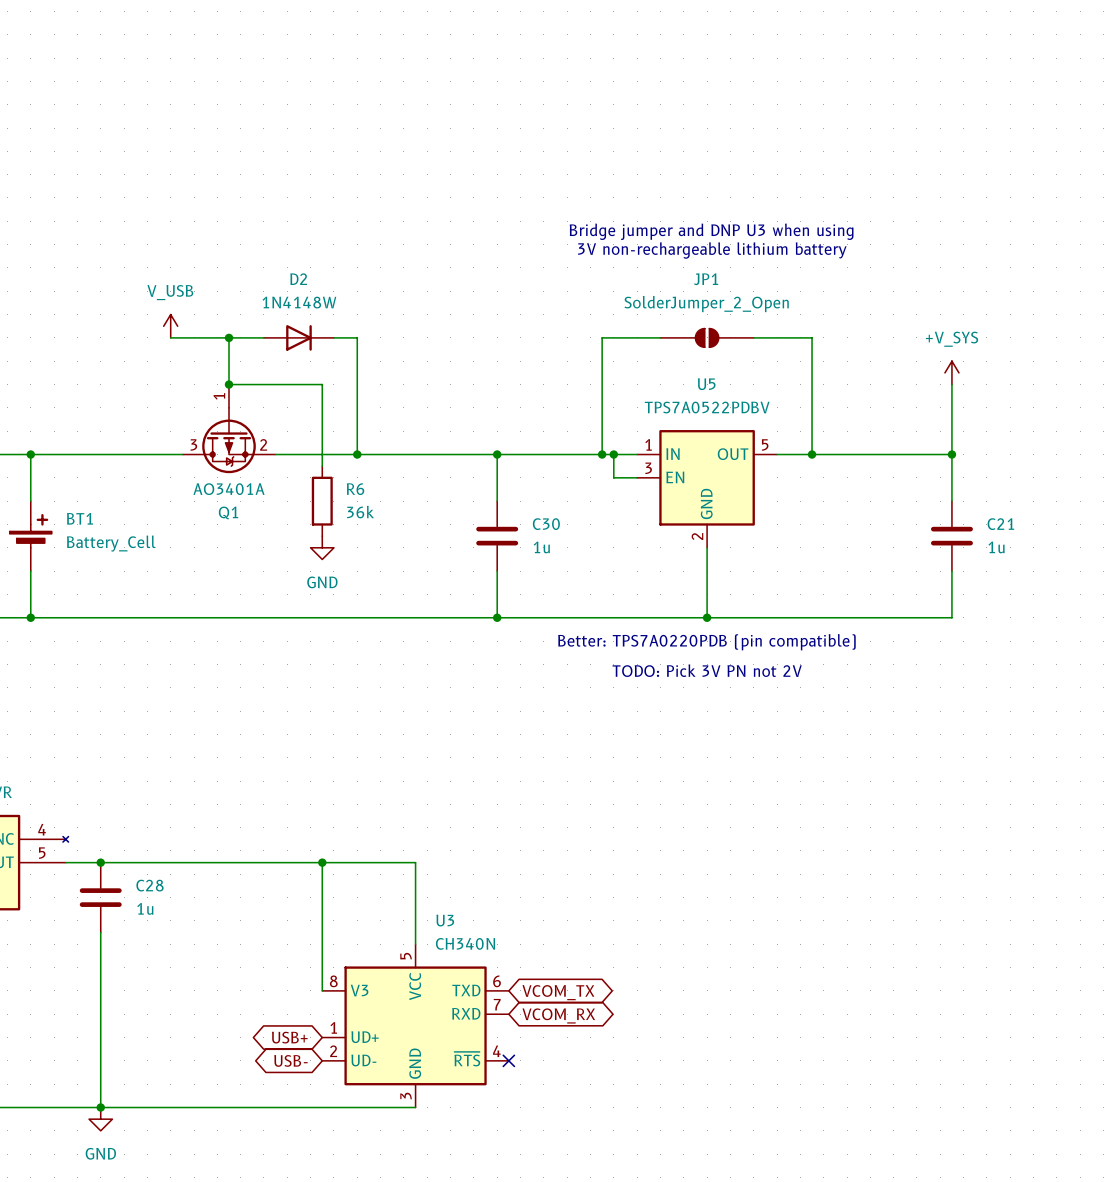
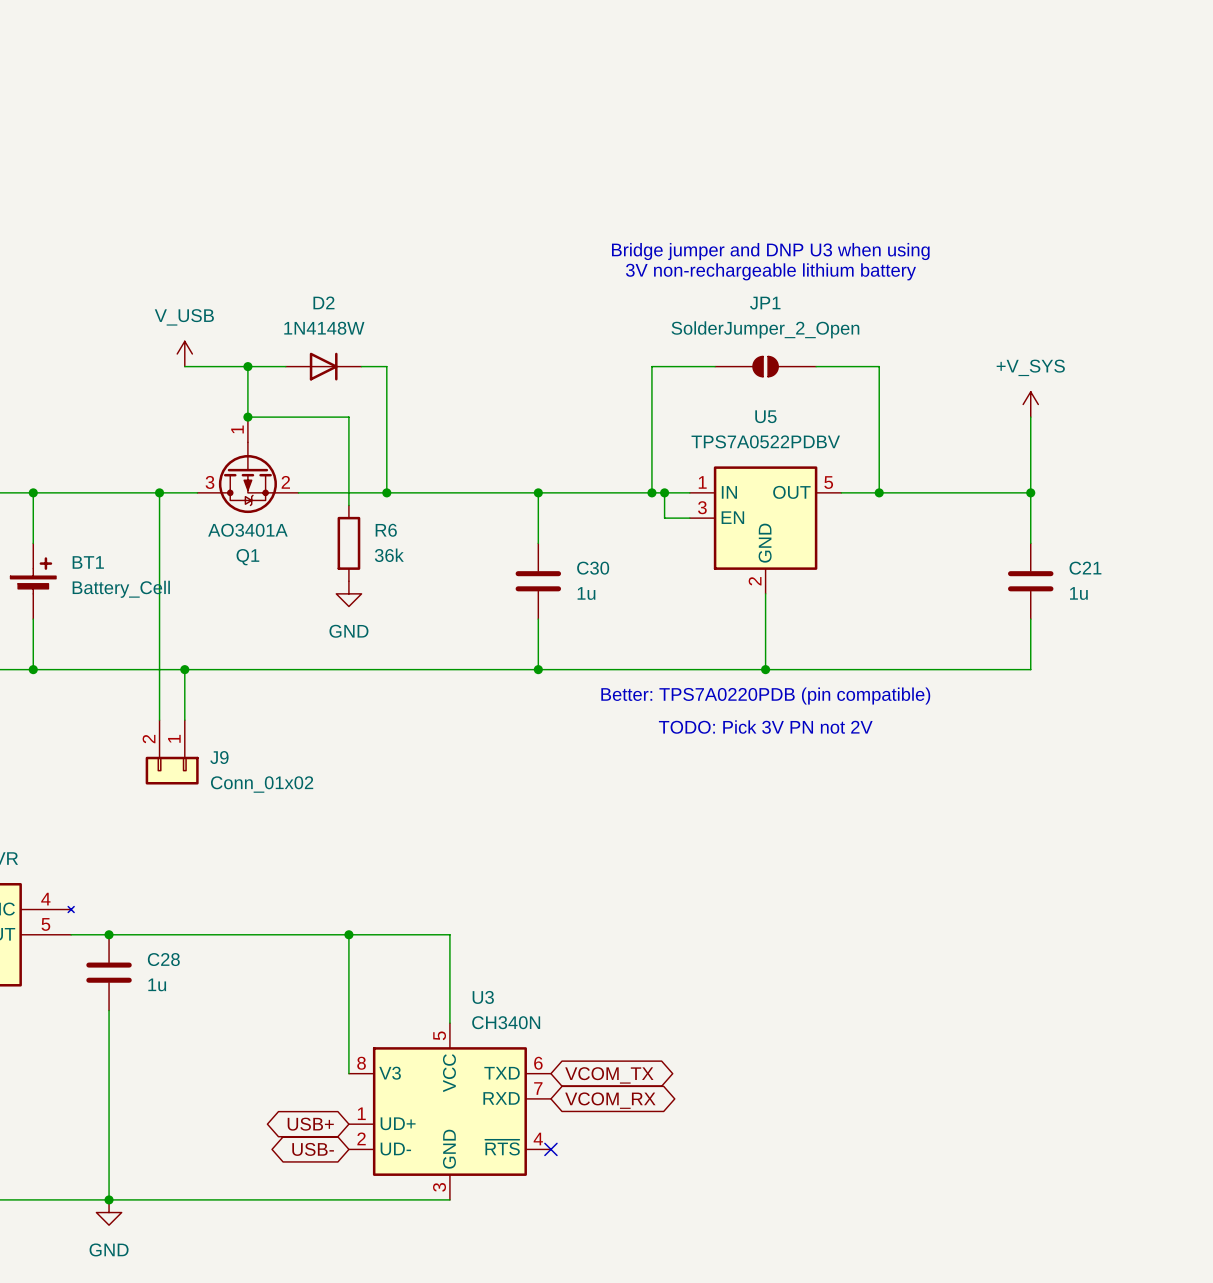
wire: none -> (159, 492) (159, 720)
junction: none -> (159, 492)
wire: none -> (184, 669) (184, 720)
junction: none -> (184, 669)
J9: none -> Conn_01x02 (172, 752)

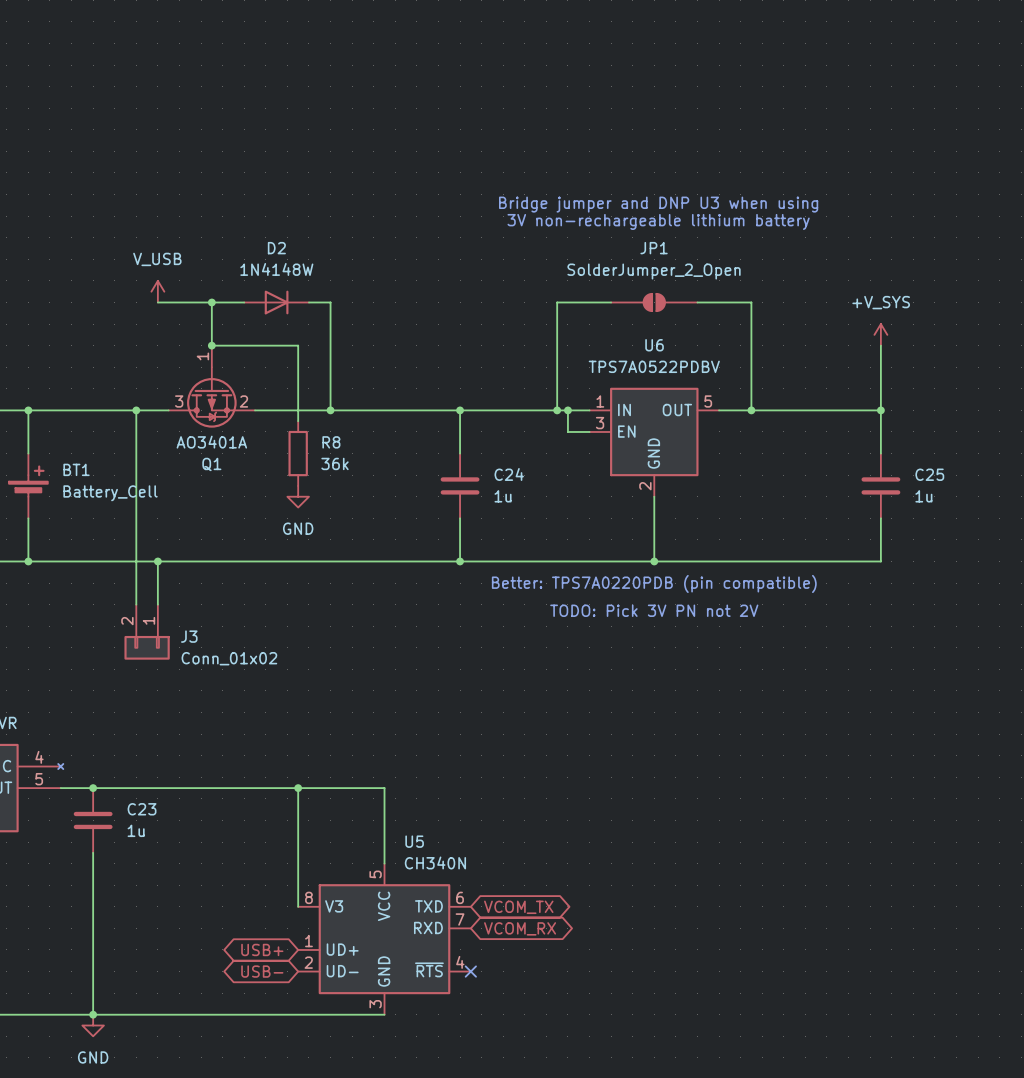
U5 name: U5 (765, 416) -> U6 (654, 345)
R6 name: R6 (386, 530) -> R8 (331, 442)
C30 name: C30 (593, 568) -> C24 (509, 474)
C21 name: C21 (1085, 568) -> C25 (929, 474)
J9 name: J9 (219, 757) -> J3 (189, 636)
C28 name: C28 (163, 959) -> C23 (142, 809)
U3 name: U3 (483, 997) -> U5 (414, 841)

